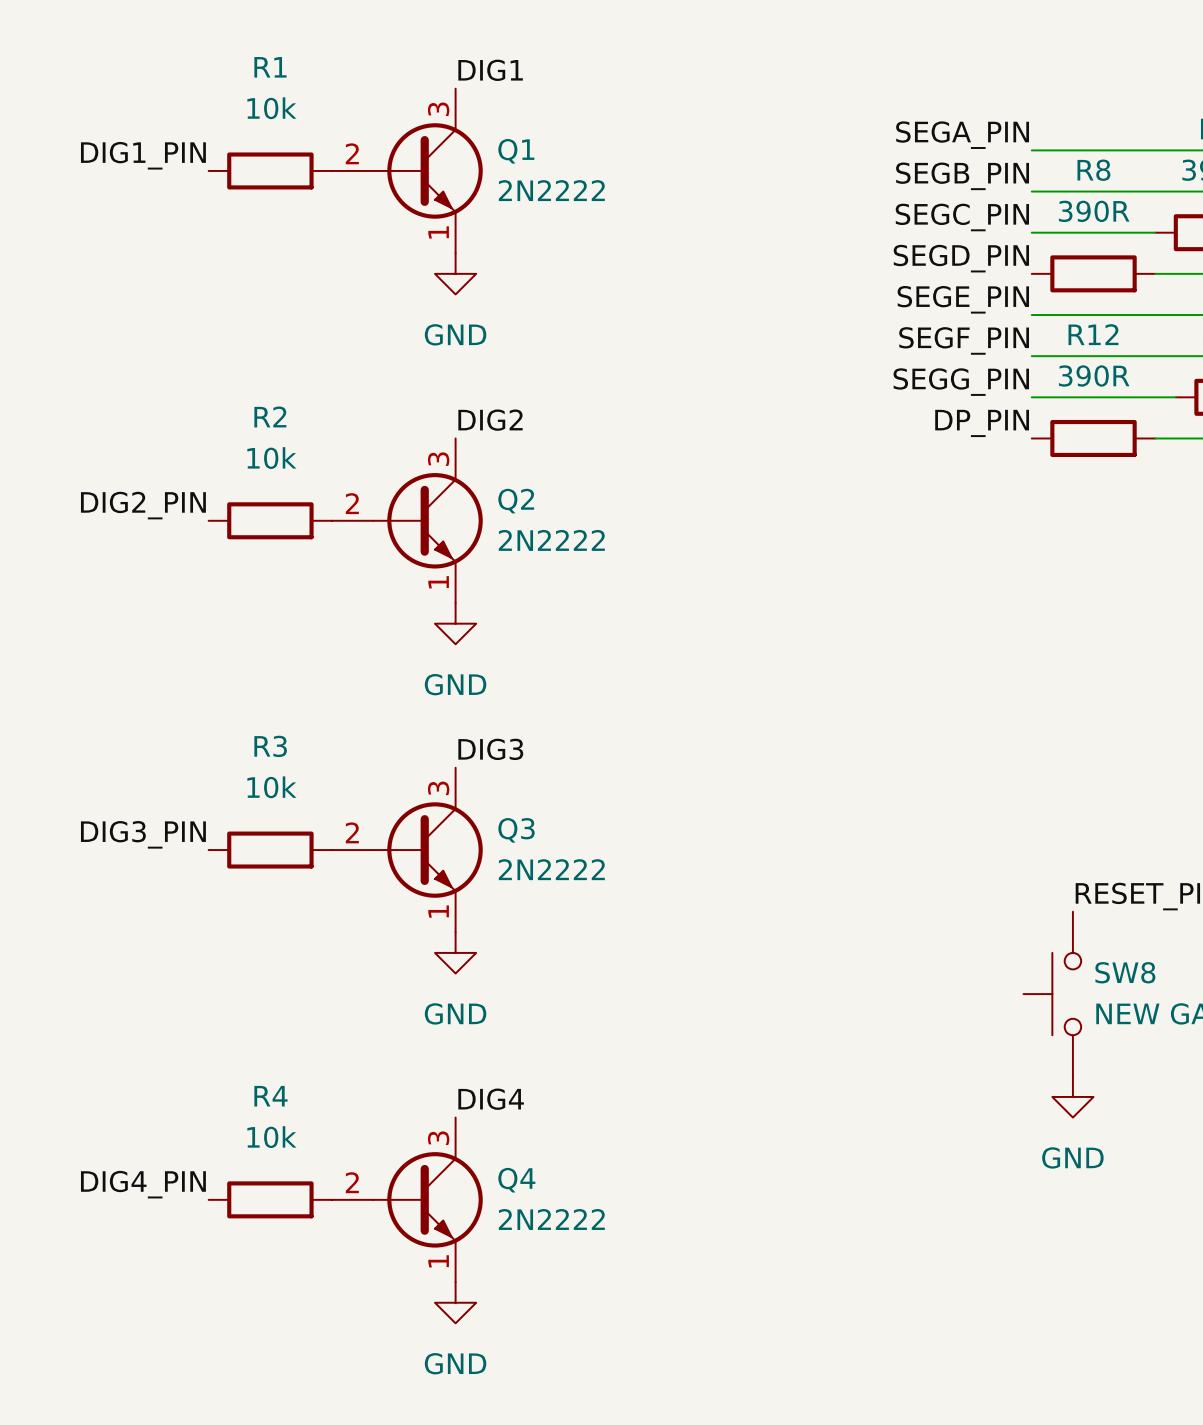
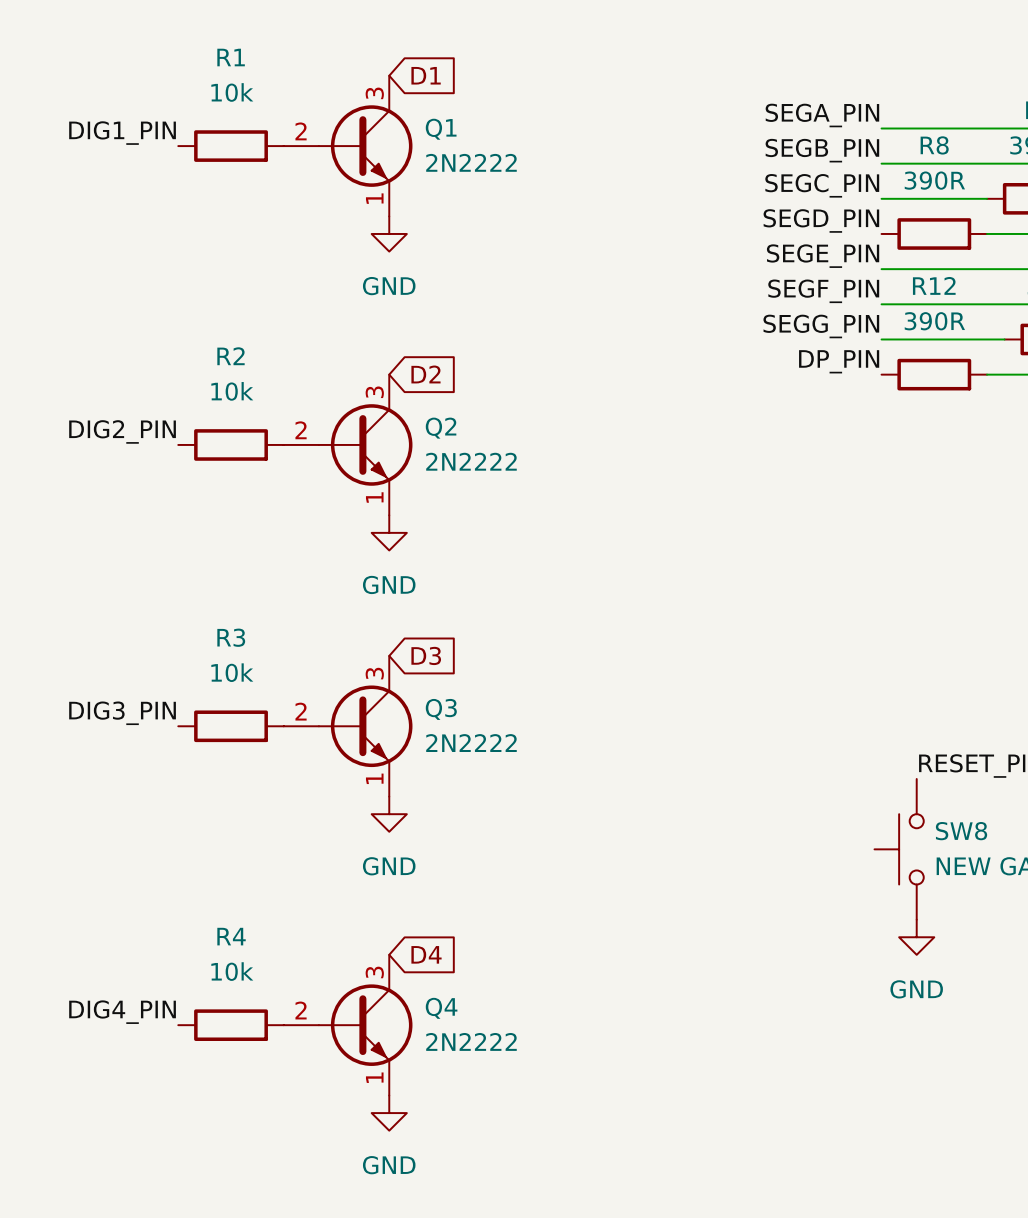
label: DIG1 (490, 70) -> none
global label: none -> D1 (426, 75)
label: DIG2 (490, 420) -> none
global label: none -> D2 (425, 374)
label: DIG3 (490, 749) -> none
global label: none -> D3 (426, 655)
label: DIG4 (491, 1099) -> none
global label: none -> D4 (426, 954)

